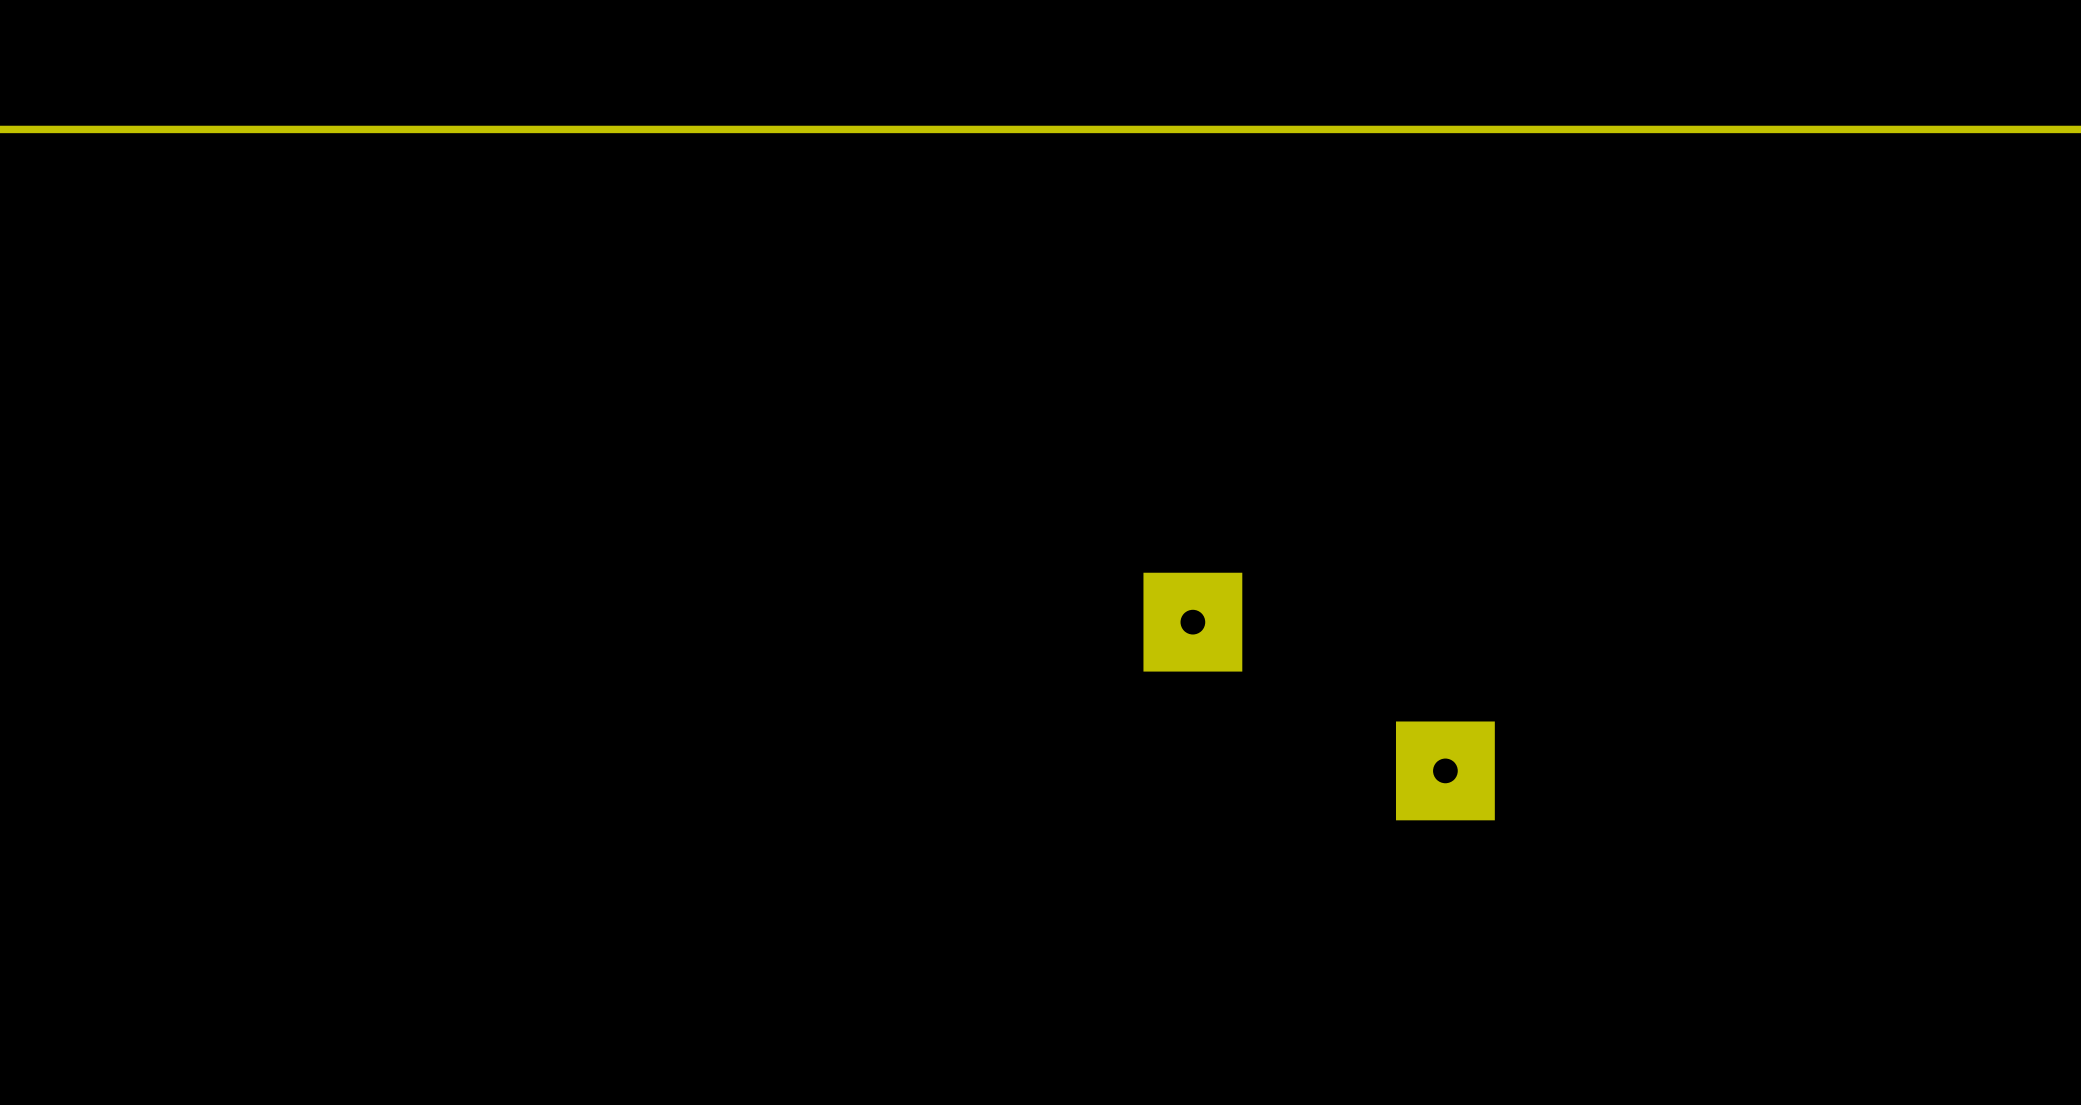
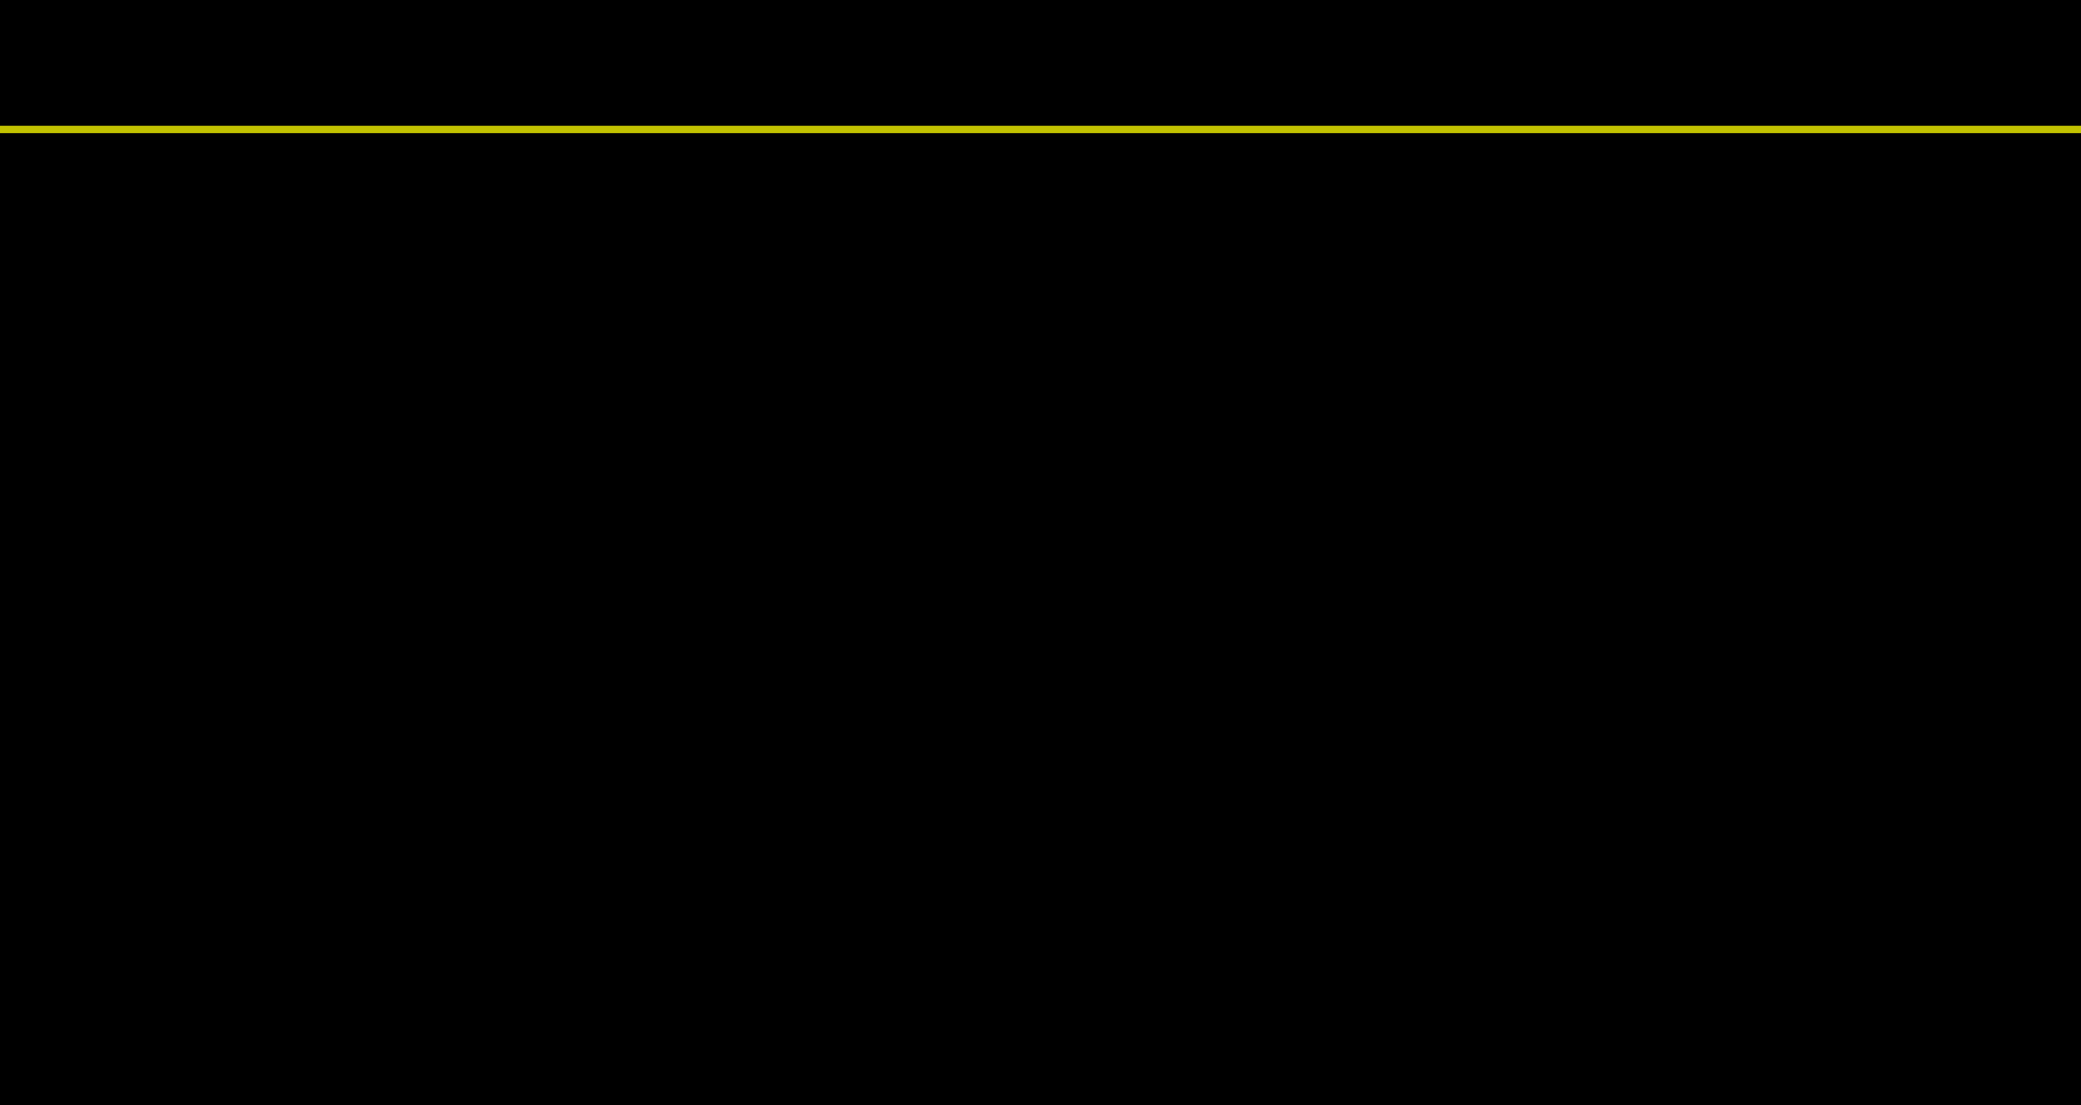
part: (1192, 622) -> none
part: (1445, 770) -> none

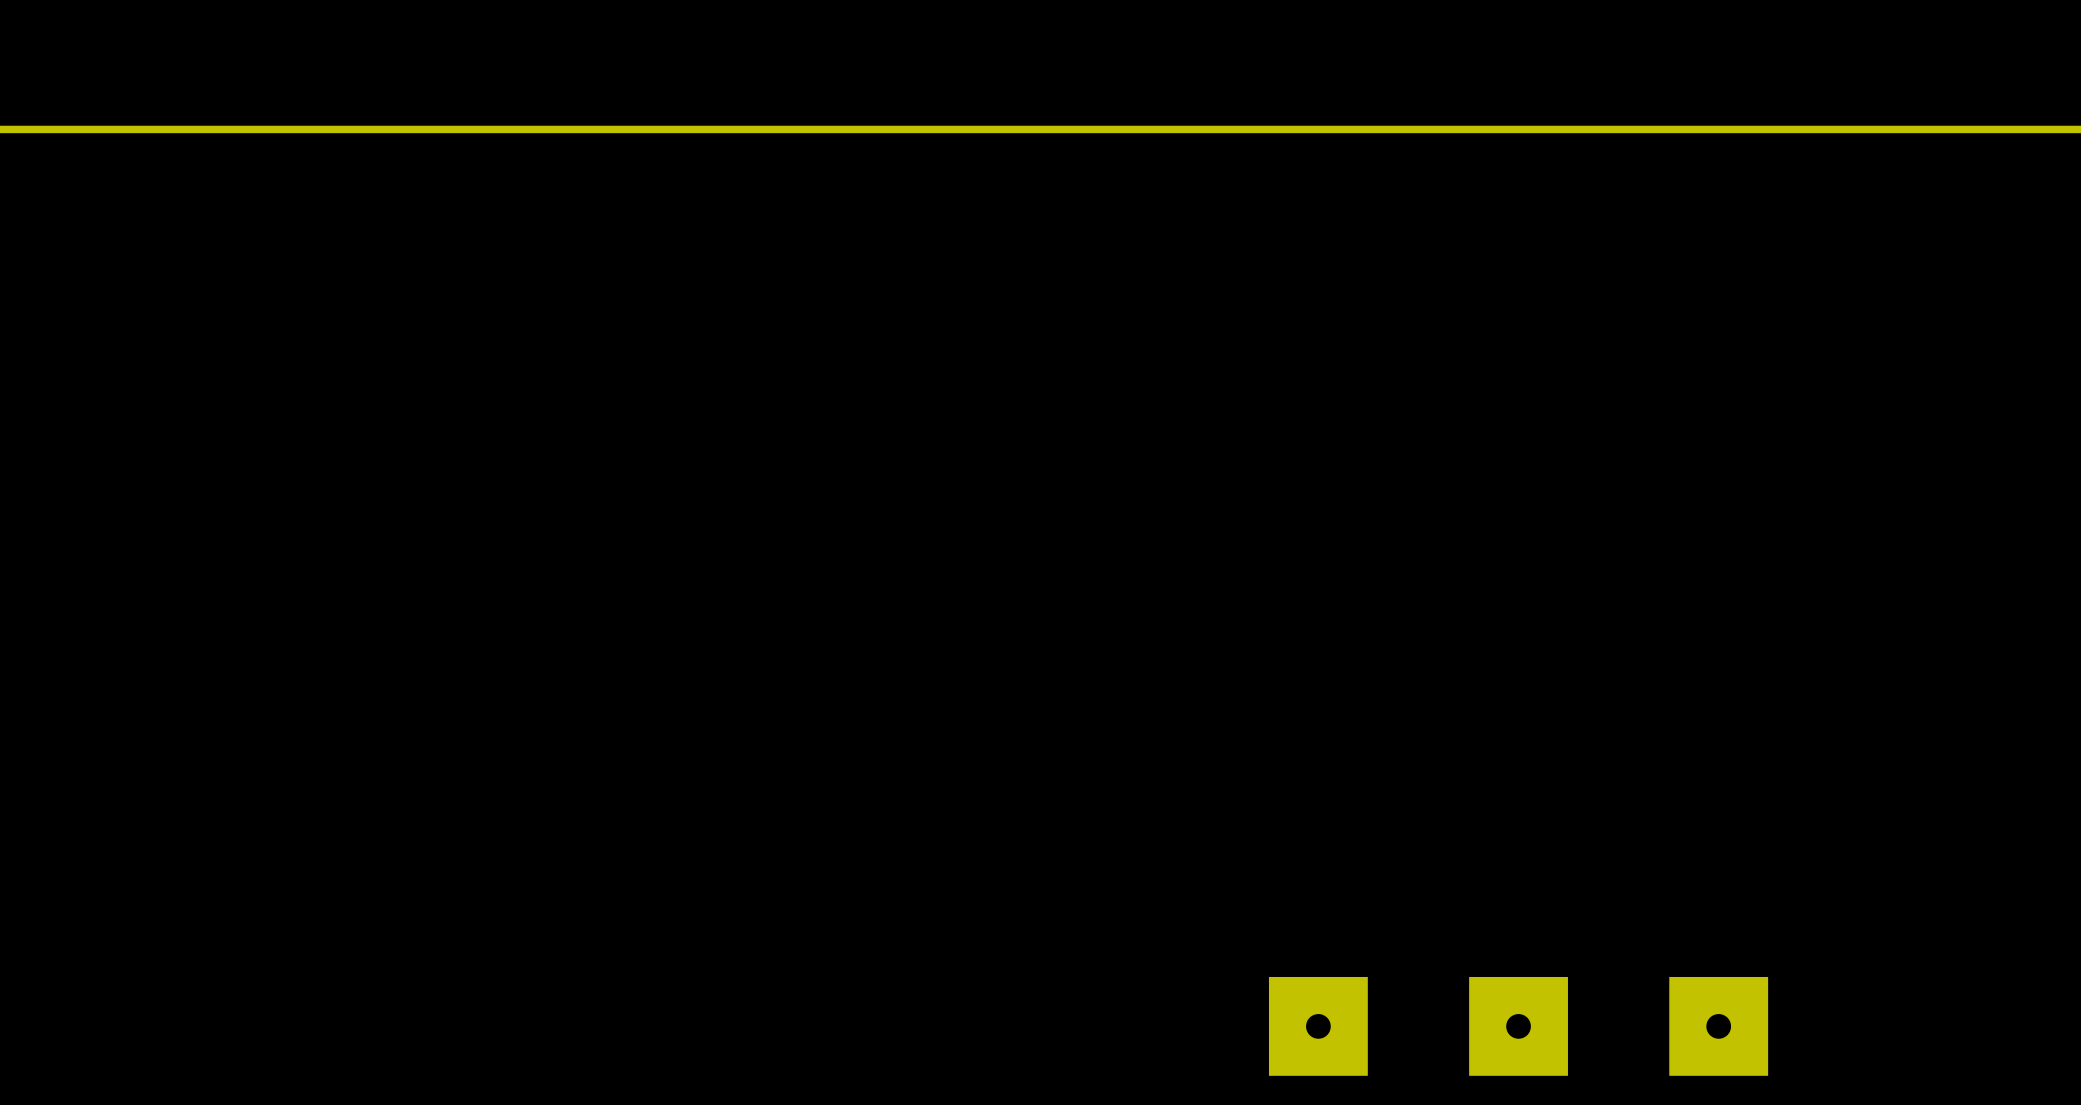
part: none -> (1318, 1026)
part: none -> (1518, 1026)
part: none -> (1718, 1026)

